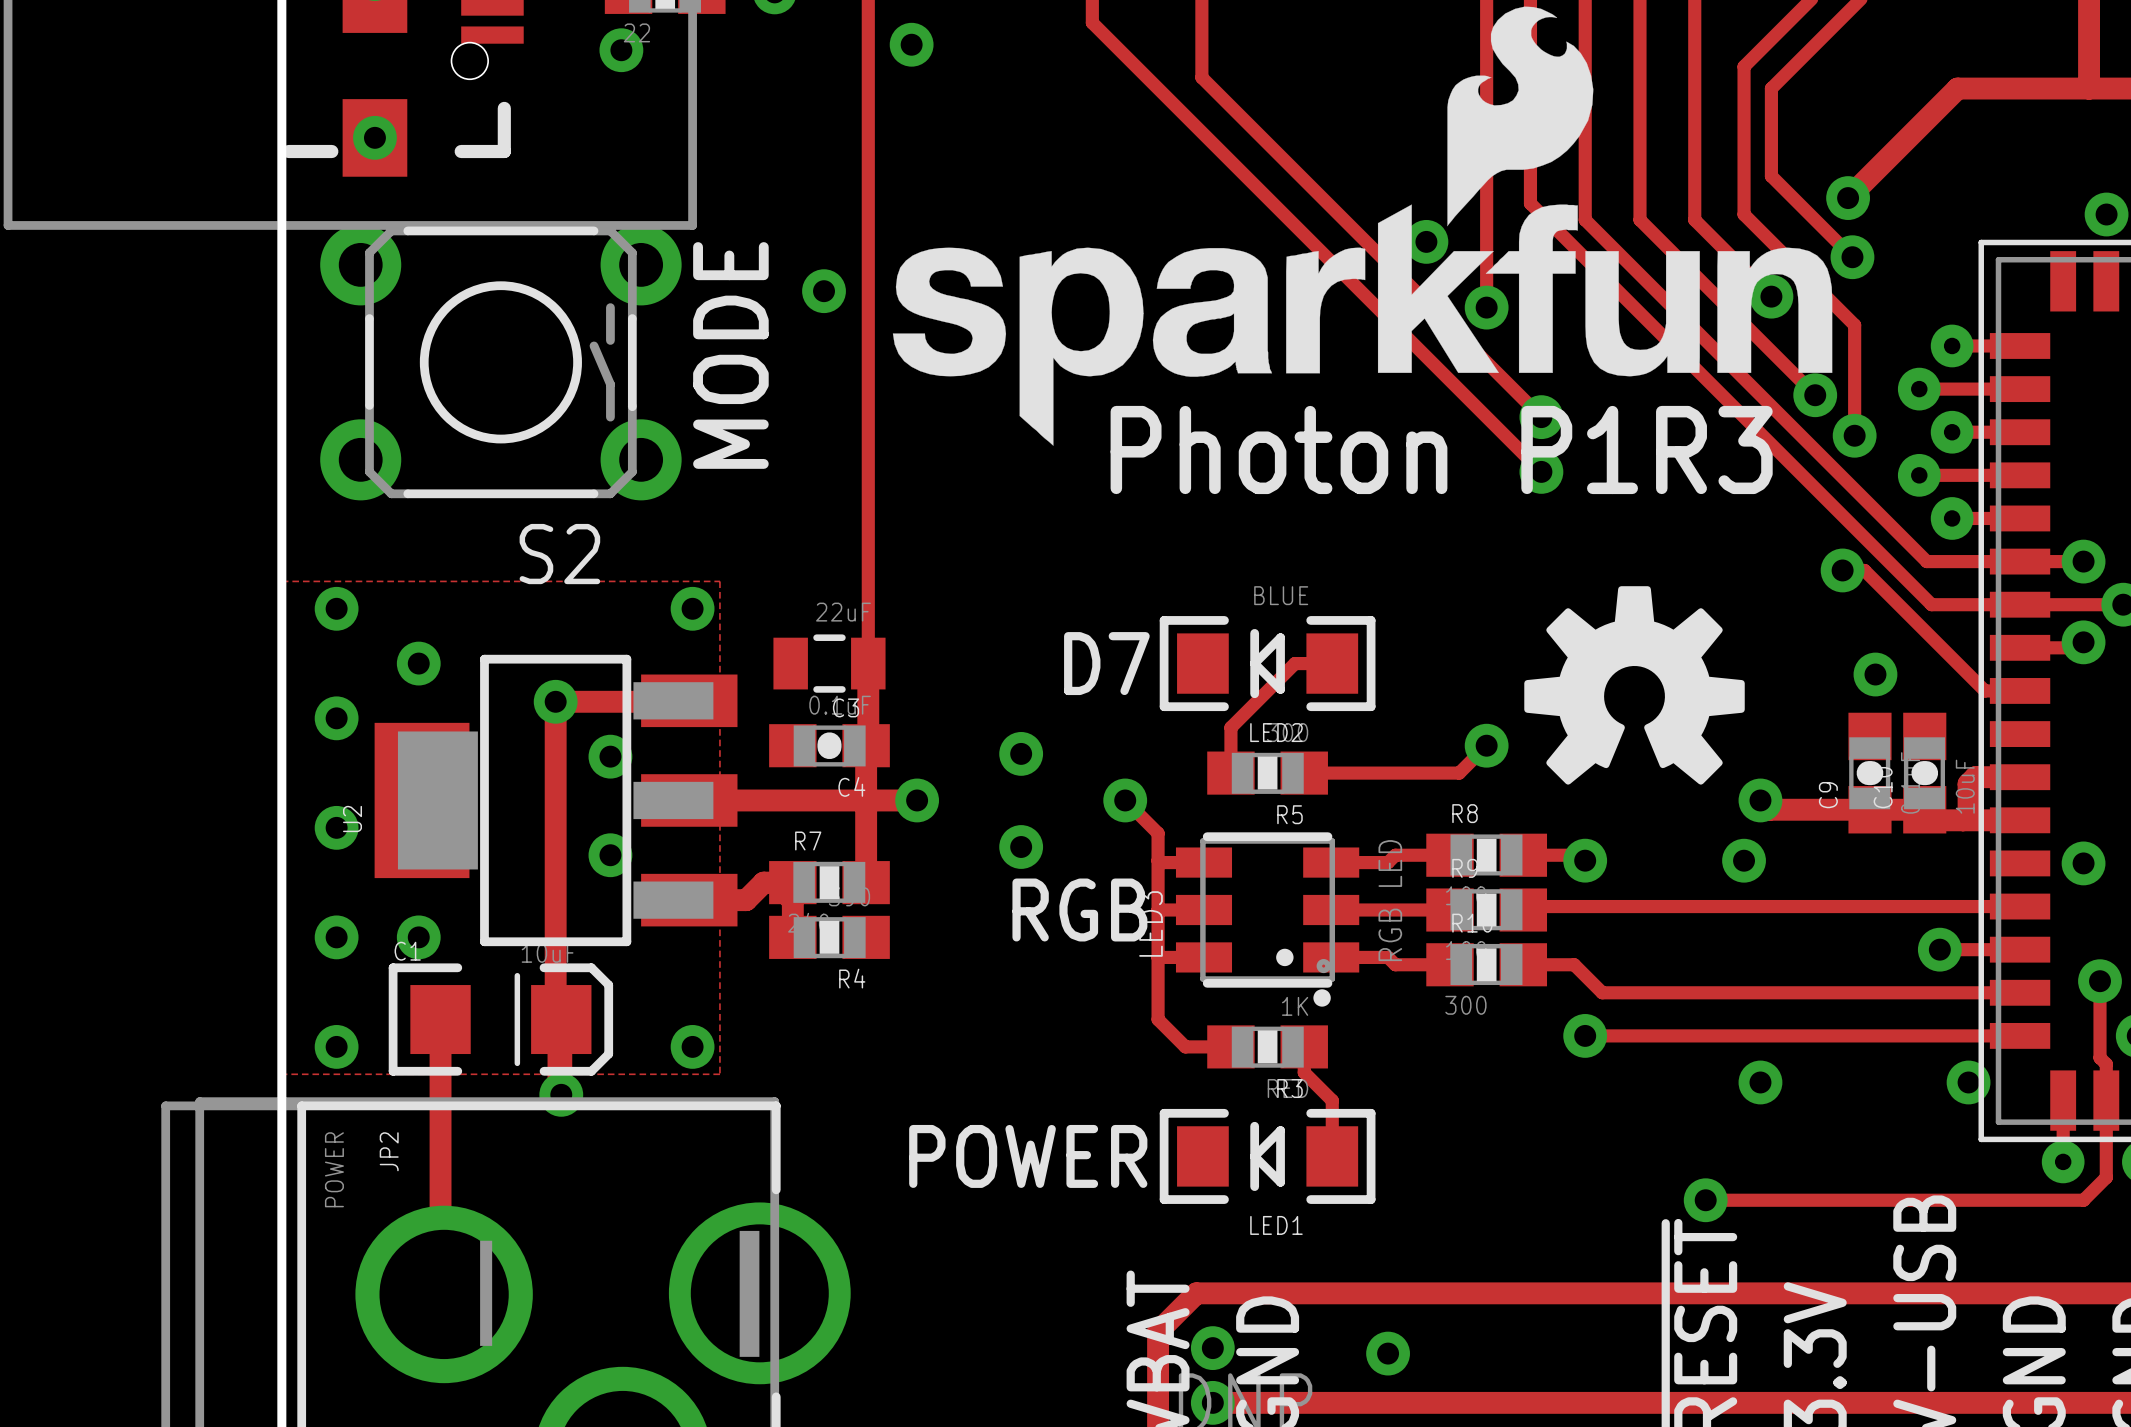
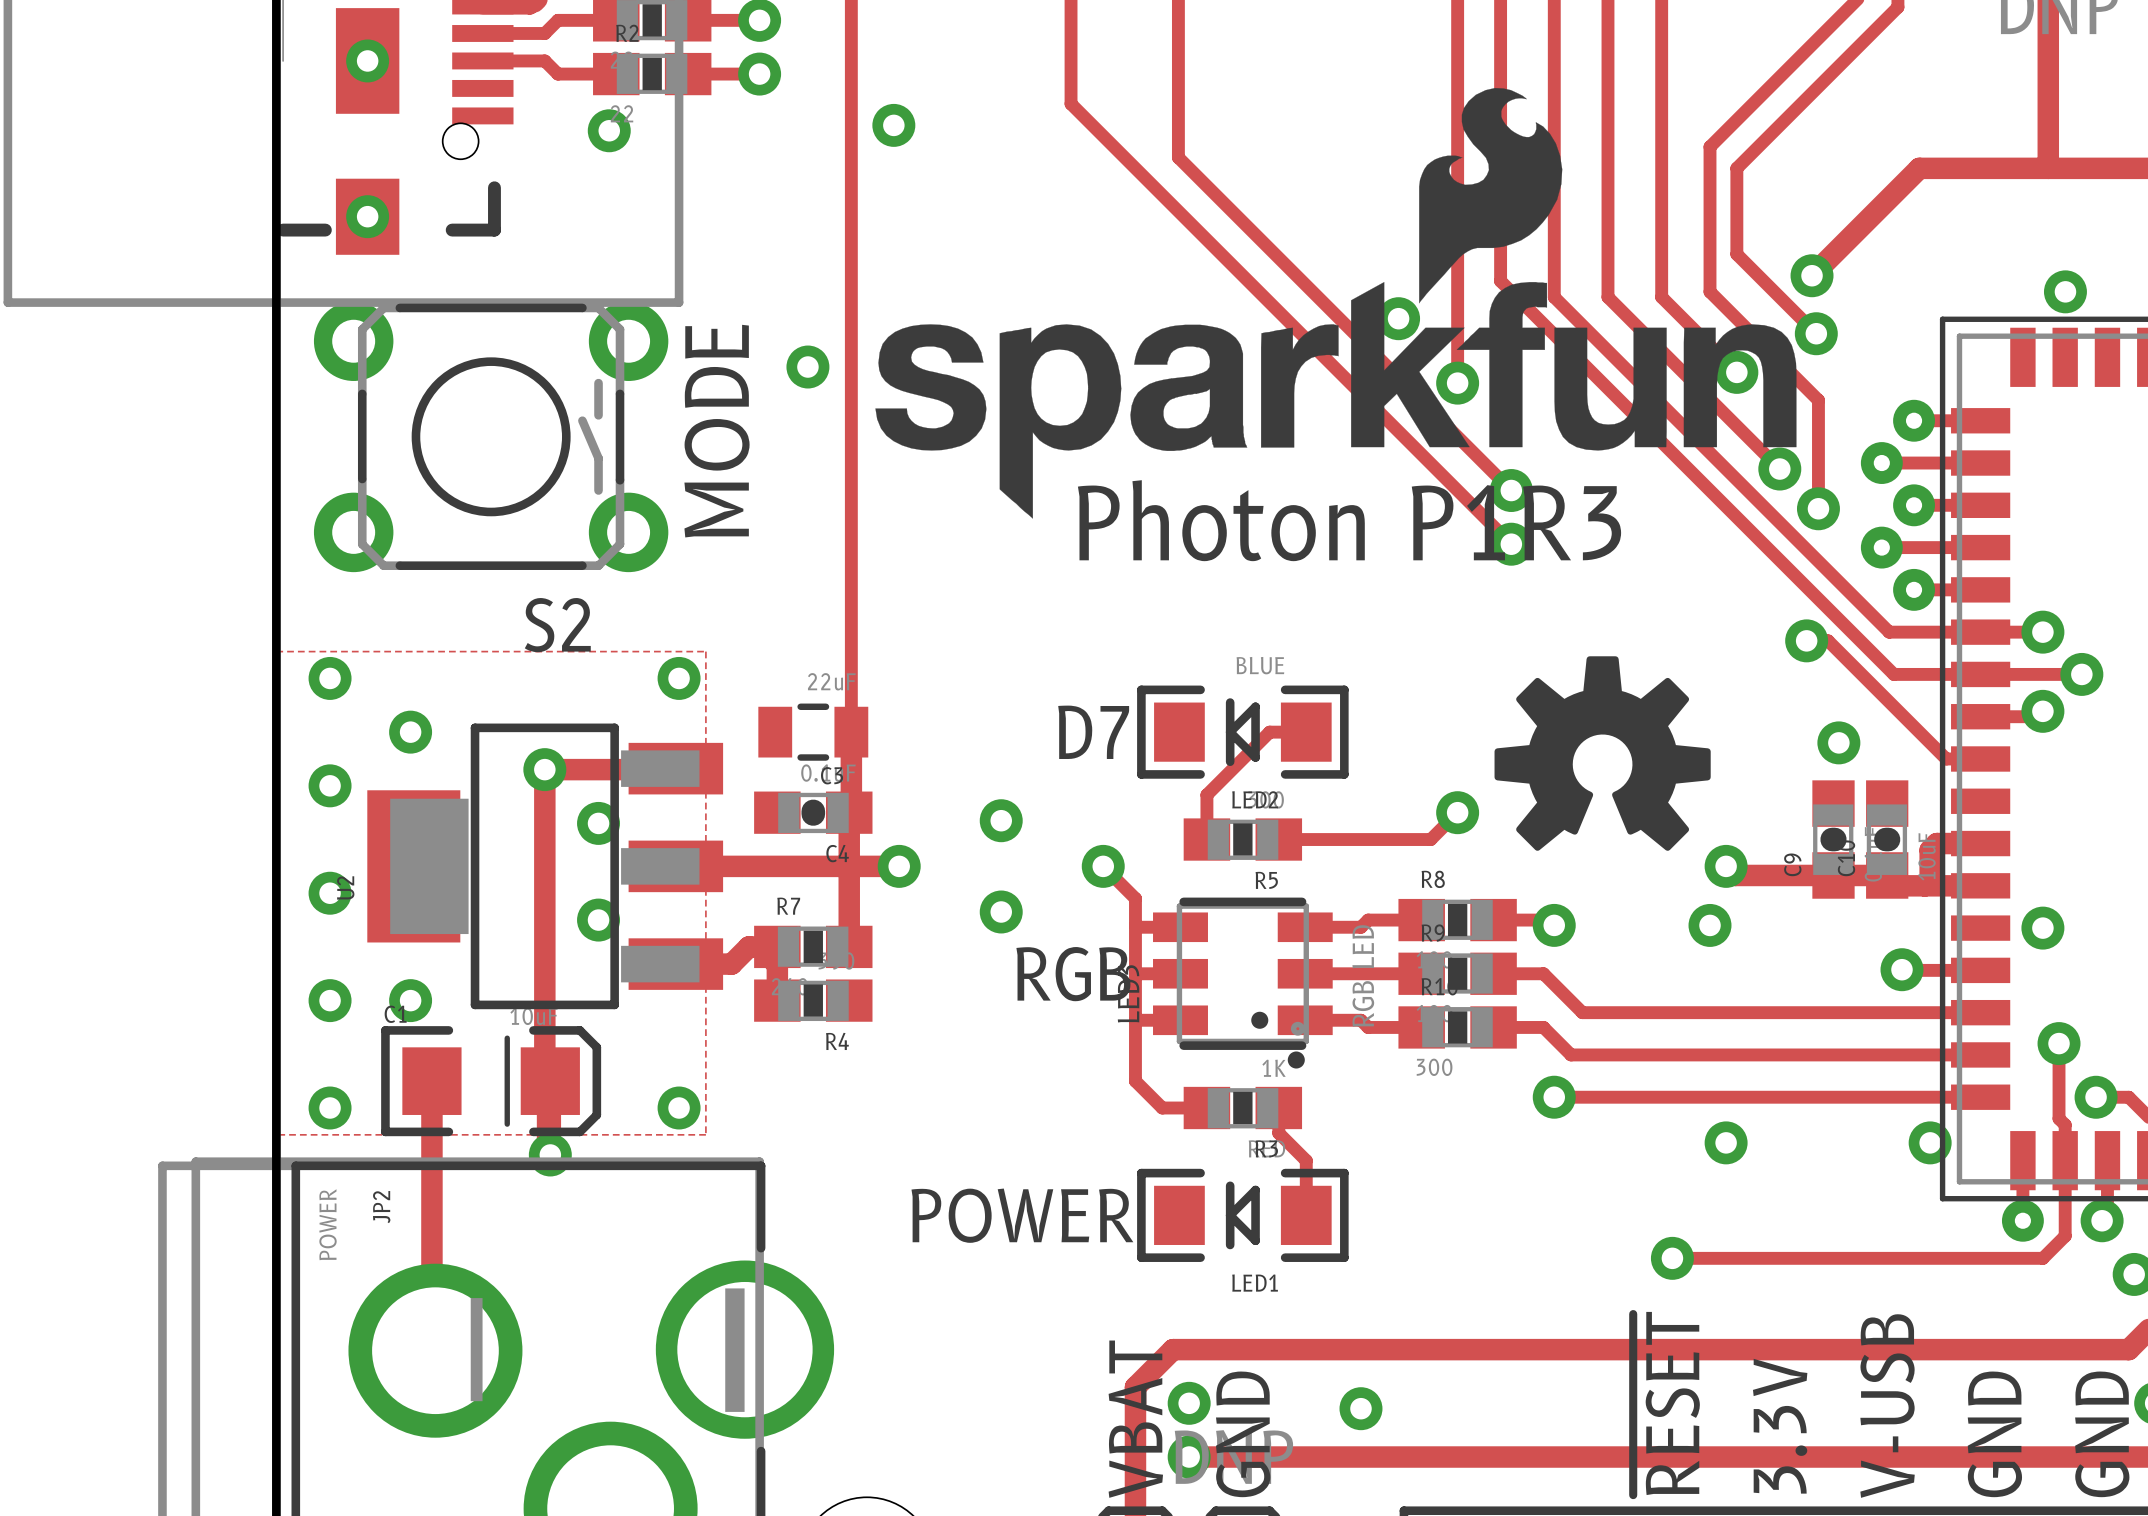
track: (1940, 906) (1526, 906) (1523, 910) -> (1901, 1012) (1582, 1012) (1543, 973) (1493, 973)
via position: (1939, 949) -> (1901, 969)

